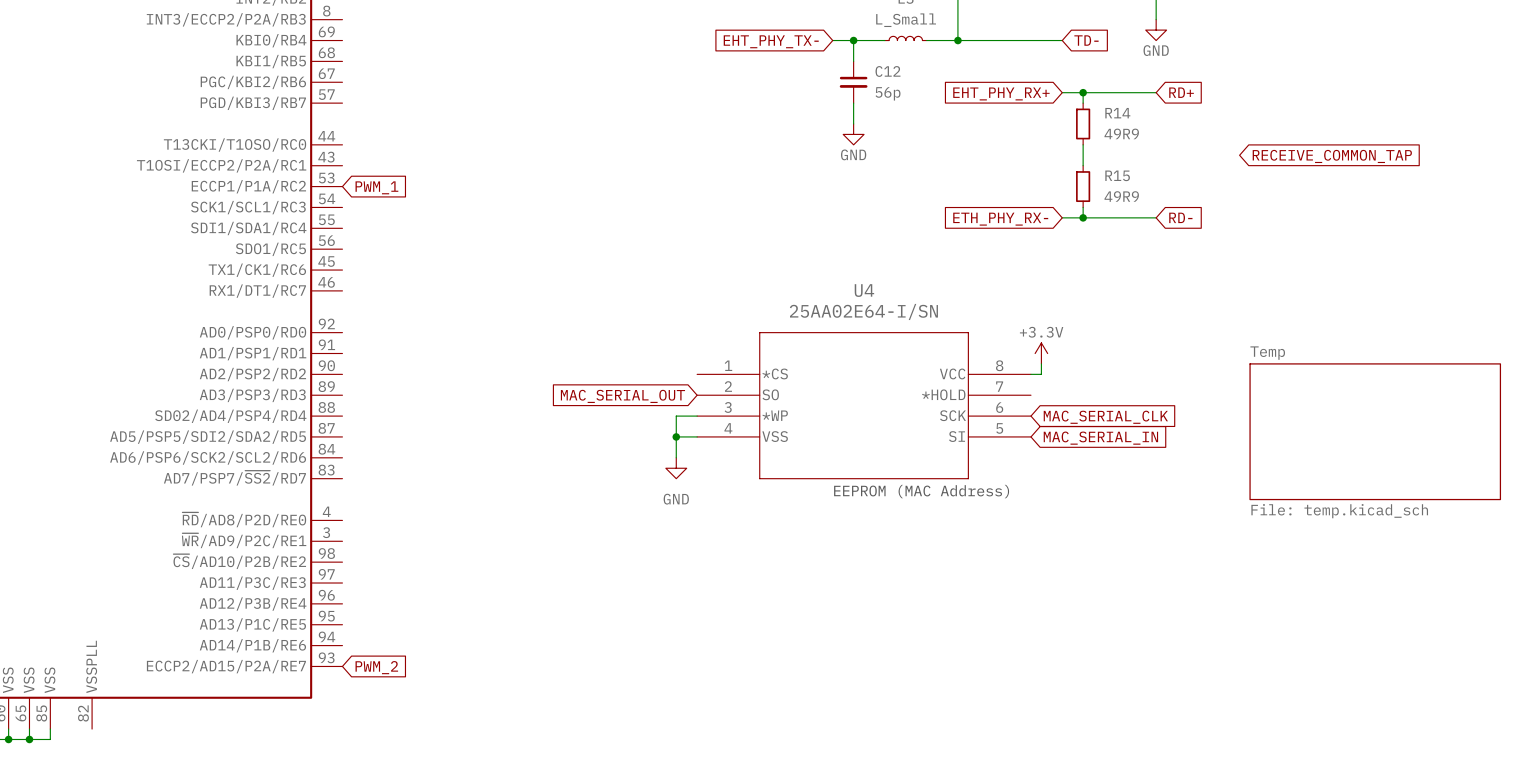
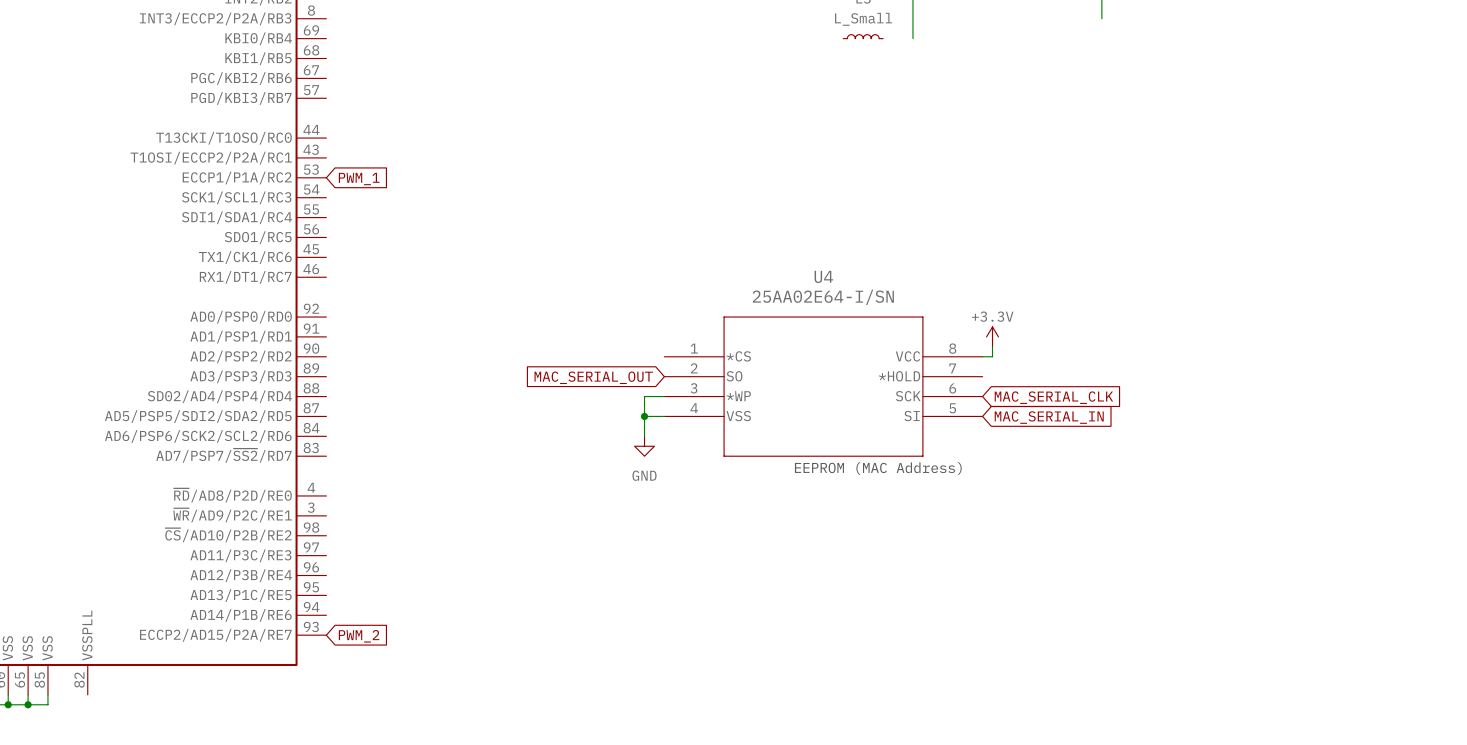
power symbol: GND (1156, 30) -> none
wire: (832, 40) (884, 40) -> none
wire: (853, 40) (853, 61) -> none
junction: (853, 40) -> none
wire: (926, 40) (1062, 40) -> none
junction: (957, 40) -> none
global label: TD- (1086, 40) -> none
global label: EHT_PHY_TX- (771, 41) -> none
C12: 56p (853, 82) -> none
wire: (1062, 92) (1156, 92) -> none
wire: (1083, 92) (1083, 103) -> none
junction: (1083, 92) -> none
global label: RD+ (1181, 92) -> none
global label: EHT_PHY_RX+ (1001, 93) -> none
wire: (853, 103) (853, 123) -> none
R14: 49R9 (1083, 123) -> none
power symbol: GND (853, 134) -> none
wire: (1083, 144) (1083, 165) -> none
global label: RECEIVE_COMMON_TAP (1332, 156) -> none
R15: 49R9 (1083, 186) -> none
wire: (1083, 207) (1083, 217) -> none
wire: (1062, 217) (1156, 217) -> none
junction: (1083, 217) -> none
global label: RD- (1180, 217) -> none
global label: ETH_PHY_RX- (1000, 219) -> none
sheet Temp: File: temp.kicad_sch (1375, 431) -> none

